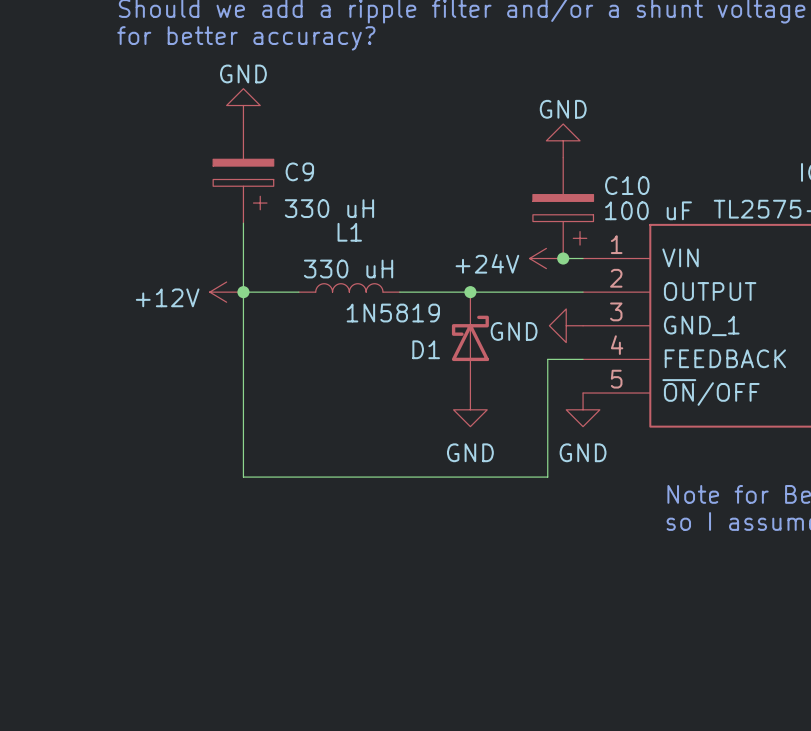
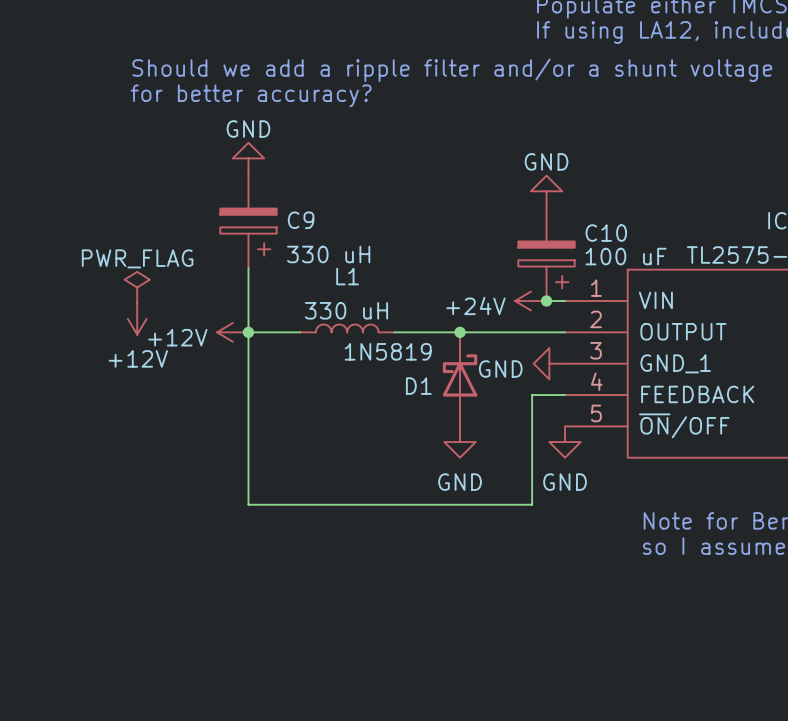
power symbol: none -> PWR_FLAG (137, 287)
power symbol: none -> +12V (137, 318)

